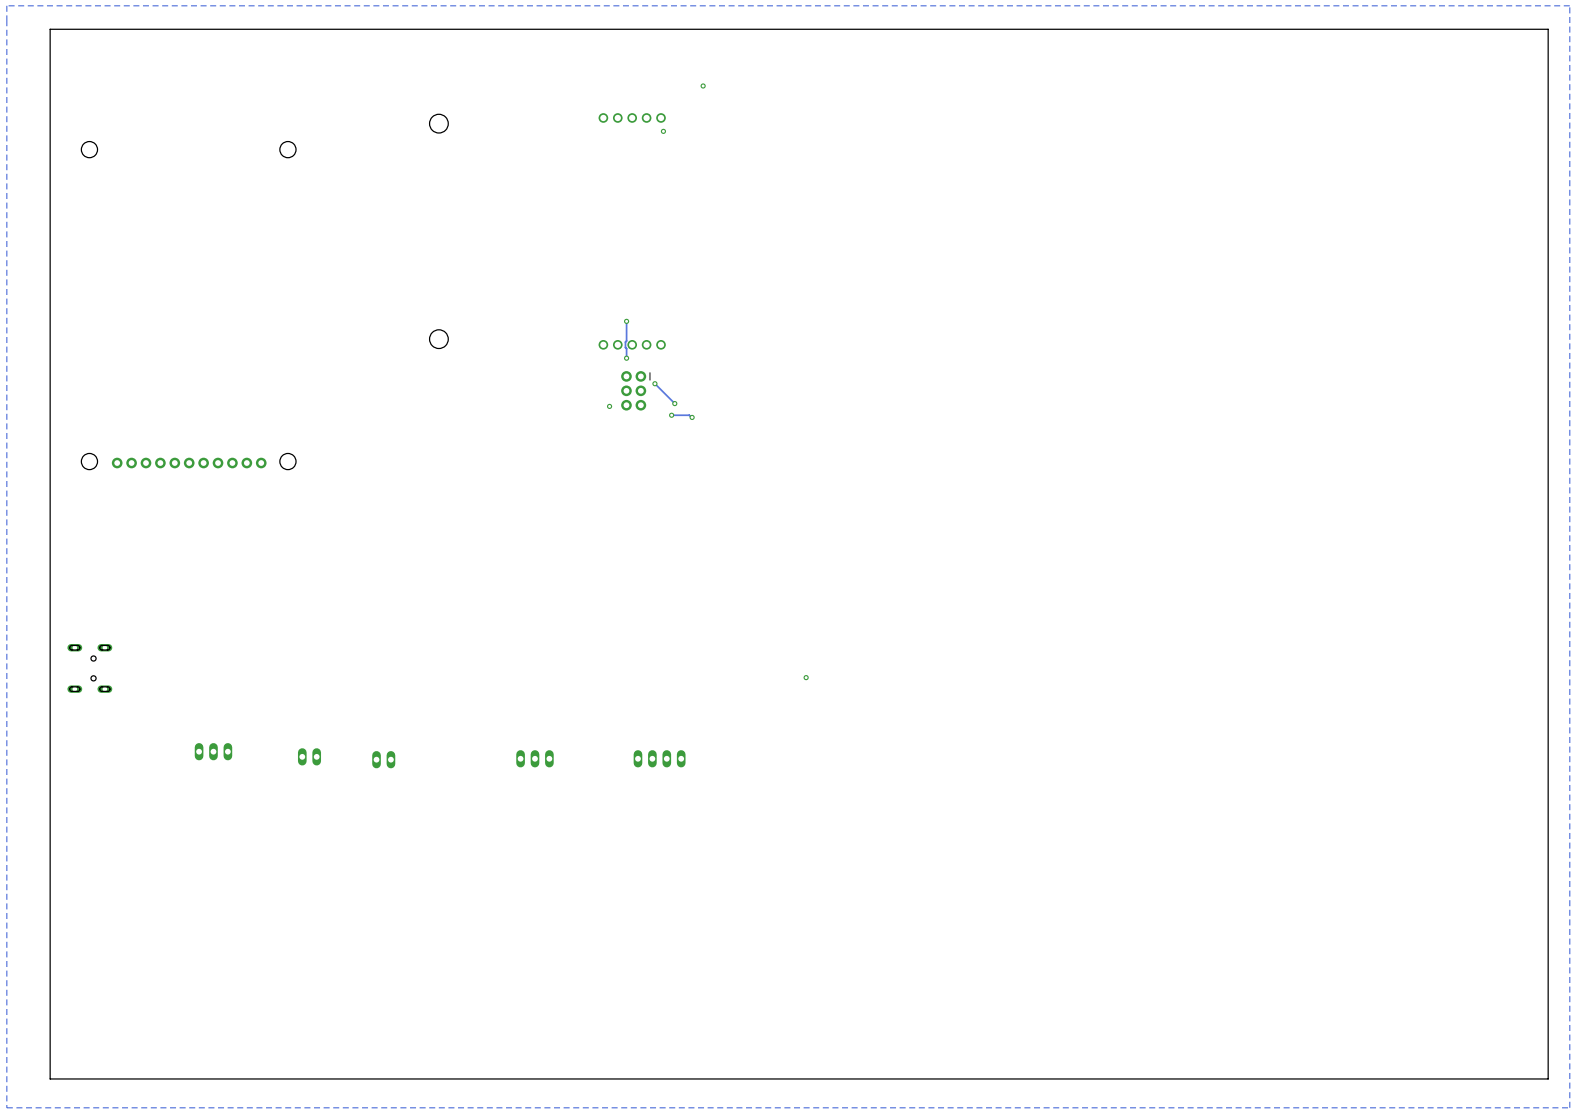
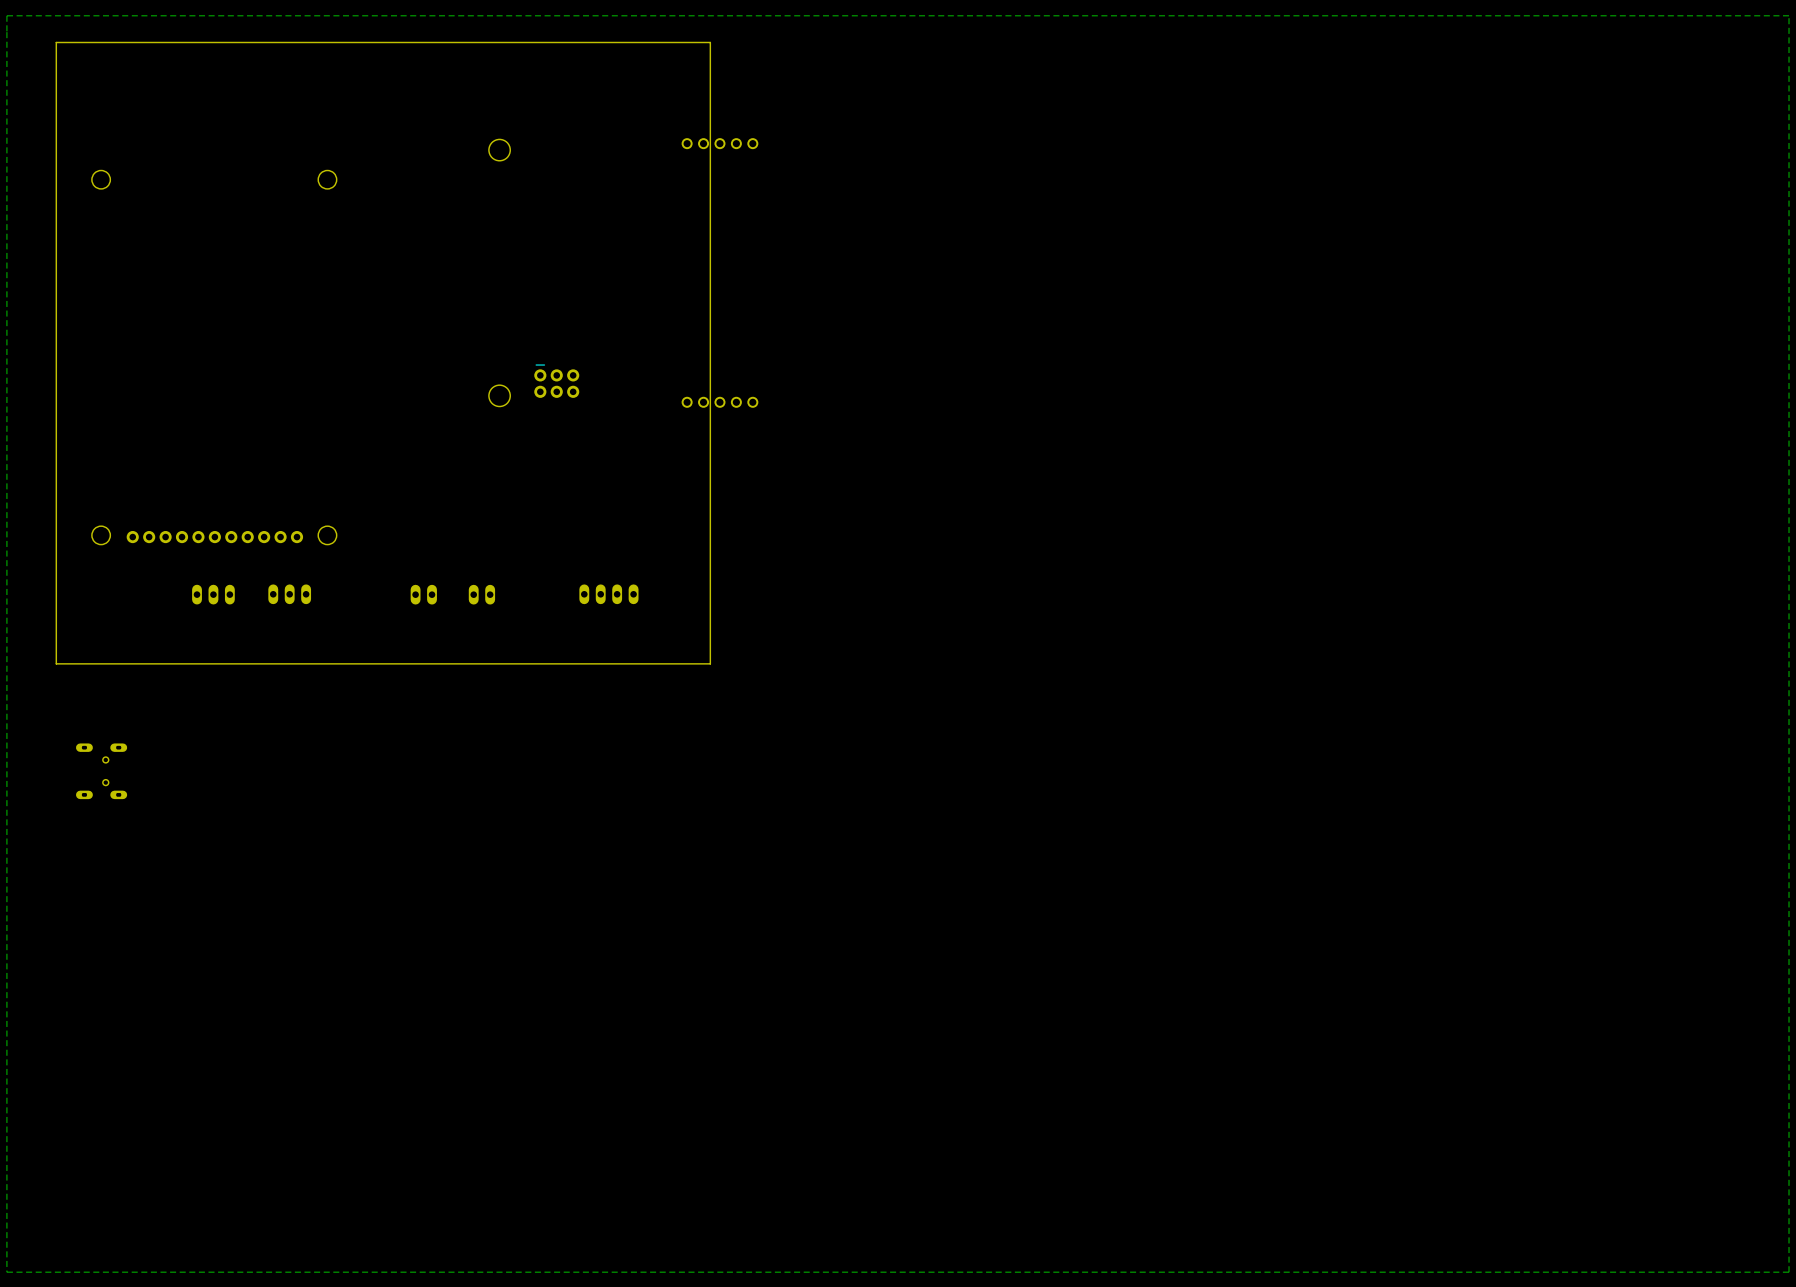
board edge: (623, 29) (1548, 29) (1548, 1078) (50, 1078) (50, 574) -> (710, 42) (710, 663) (56, 663)
via: (703, 85) -> none
via: (663, 131) -> none
track: (626, 321) (626, 358) -> none
via: (626, 321) -> none
part: none -> (556, 381)
via: (626, 358) -> none
track: (654, 383) (674, 403) -> none
via: (654, 383) -> none
part: (635, 390) -> none
via: (674, 403) -> none
via: (609, 406) -> none
track: (671, 415) (689, 415) (692, 417) -> none
via: (671, 415) -> none
via: (692, 417) -> none
part: none -> (213, 594)
part: none -> (289, 594)
part: none -> (423, 594)
part: none -> (481, 594)
part: none -> (608, 594)
via: (806, 677) -> none
part: (213, 751) -> none
part: (309, 756) -> none
part: (534, 758) -> none
part: (659, 758) -> none
part: (383, 759) -> none

